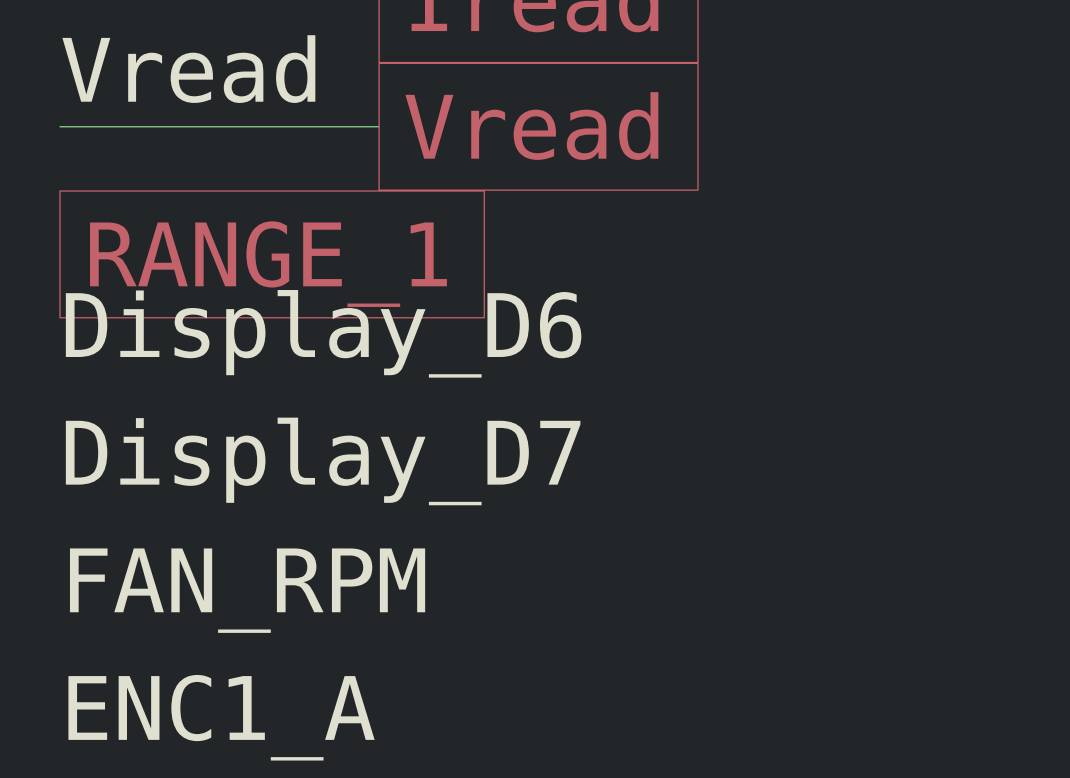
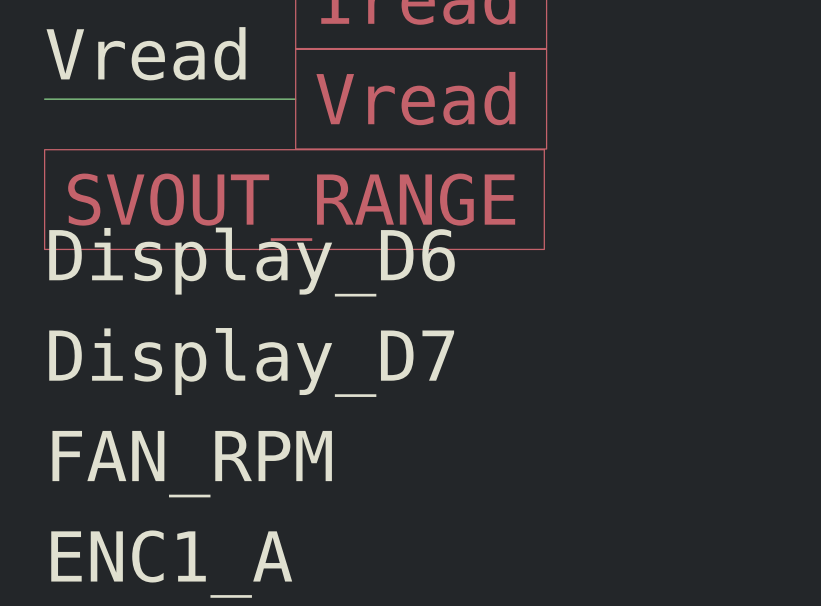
global label: RANGE_1 (268, 264) -> SVOUT_RANGE (291, 207)

